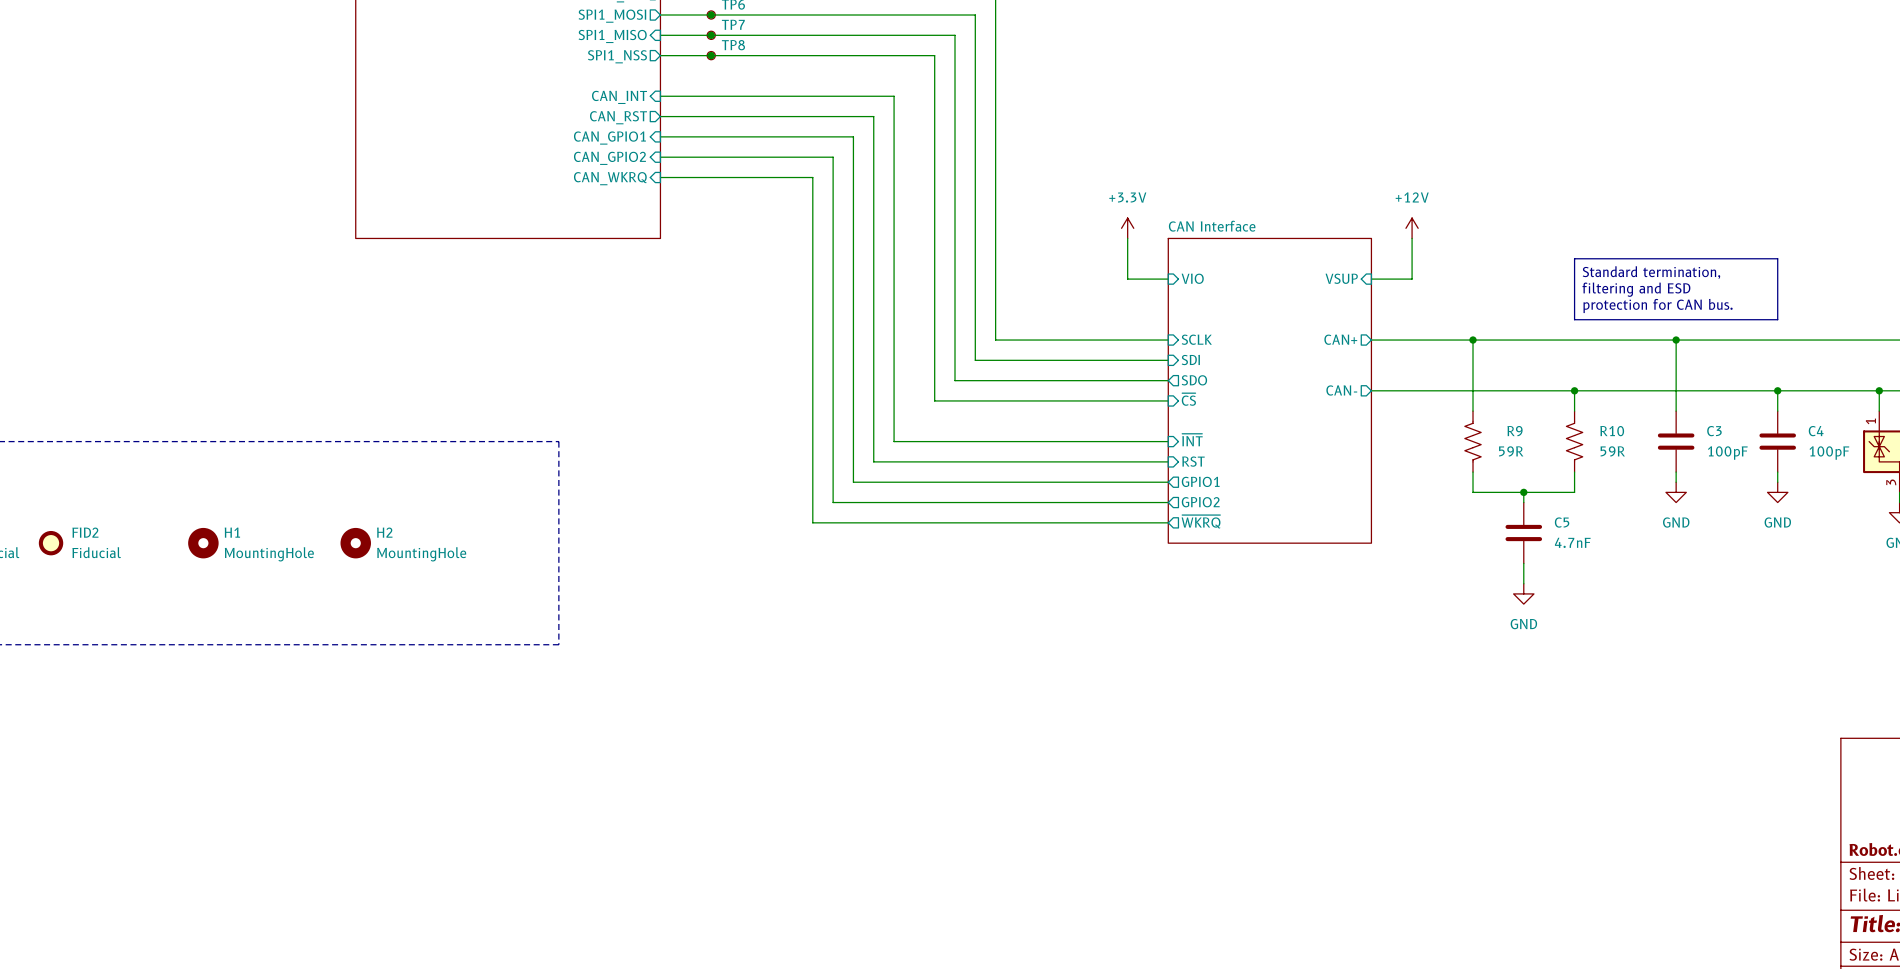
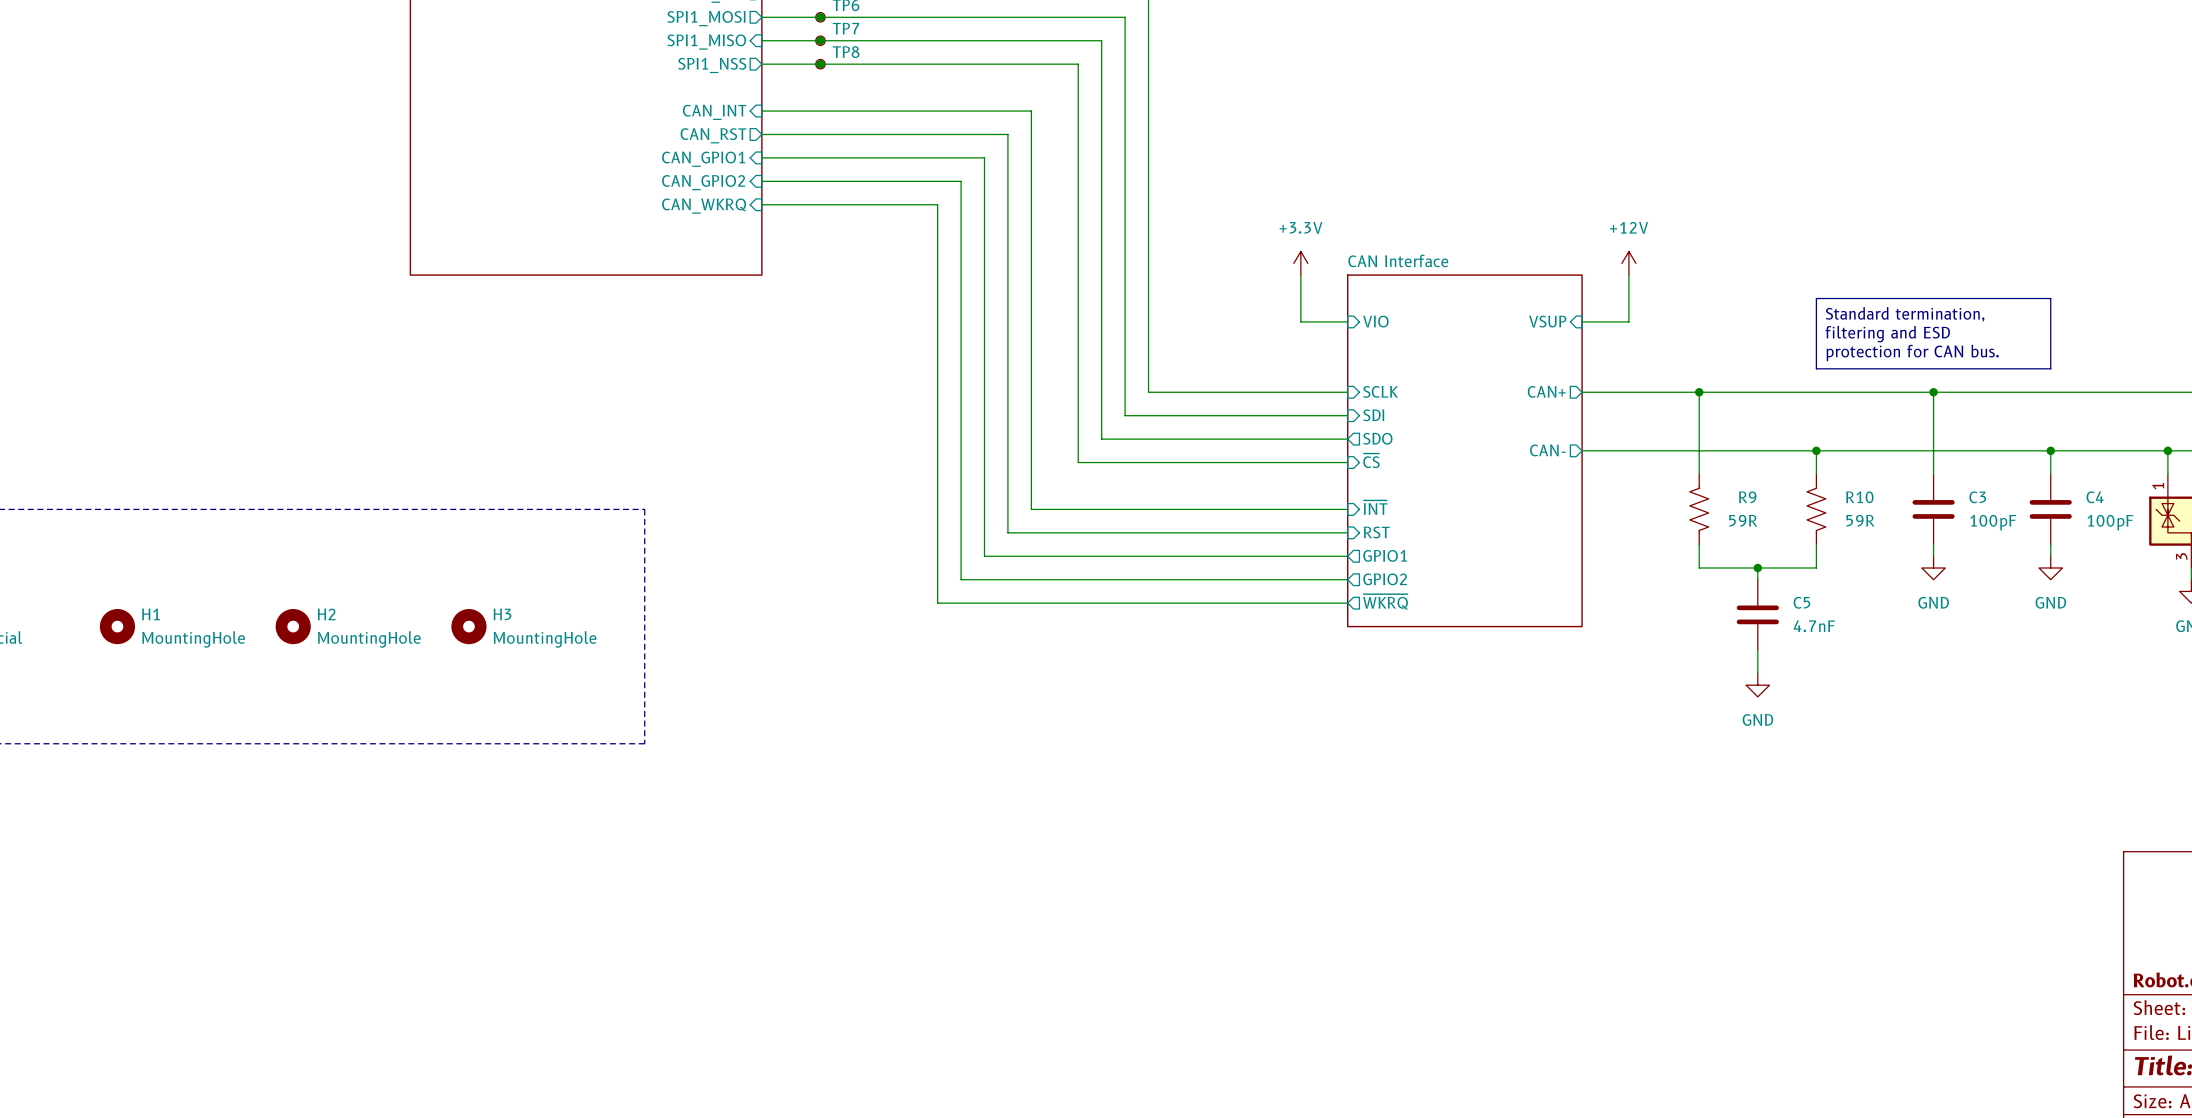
FID2: Fiducial (51, 543) -> none
H1 position: (203, 543) -> (117, 626)
H2 position: (355, 543) -> (293, 626)
H3: none -> MountingHole (468, 626)

